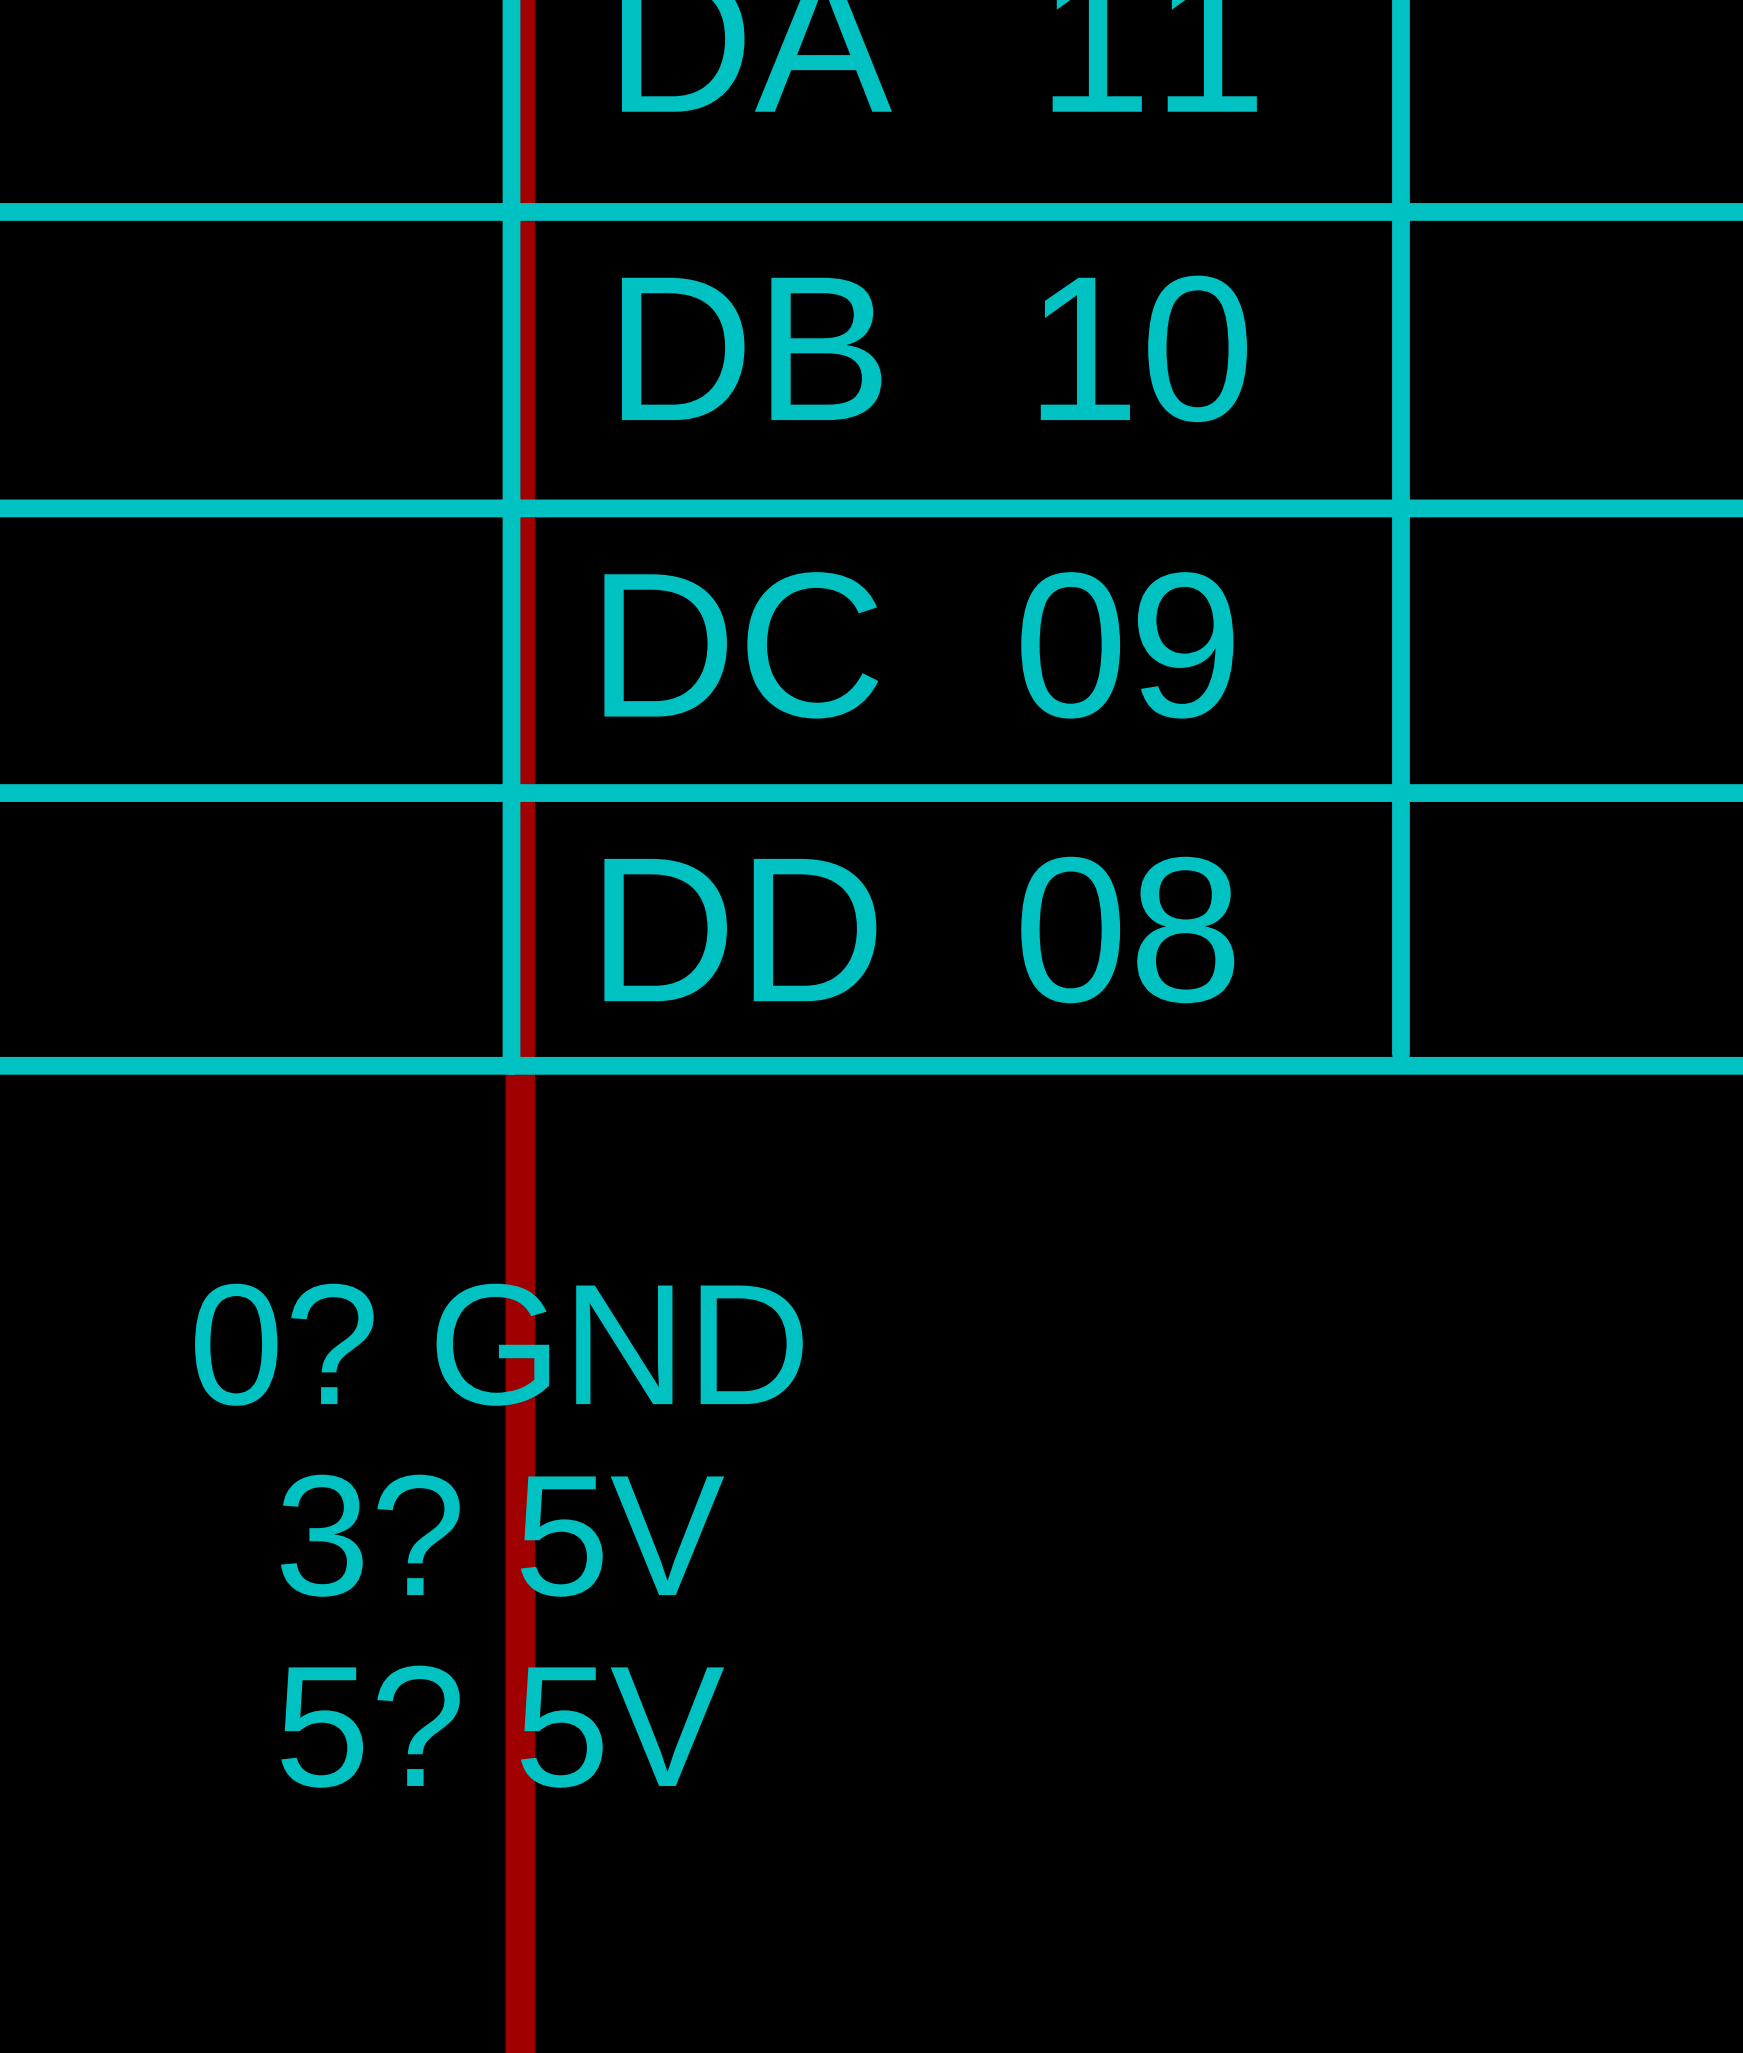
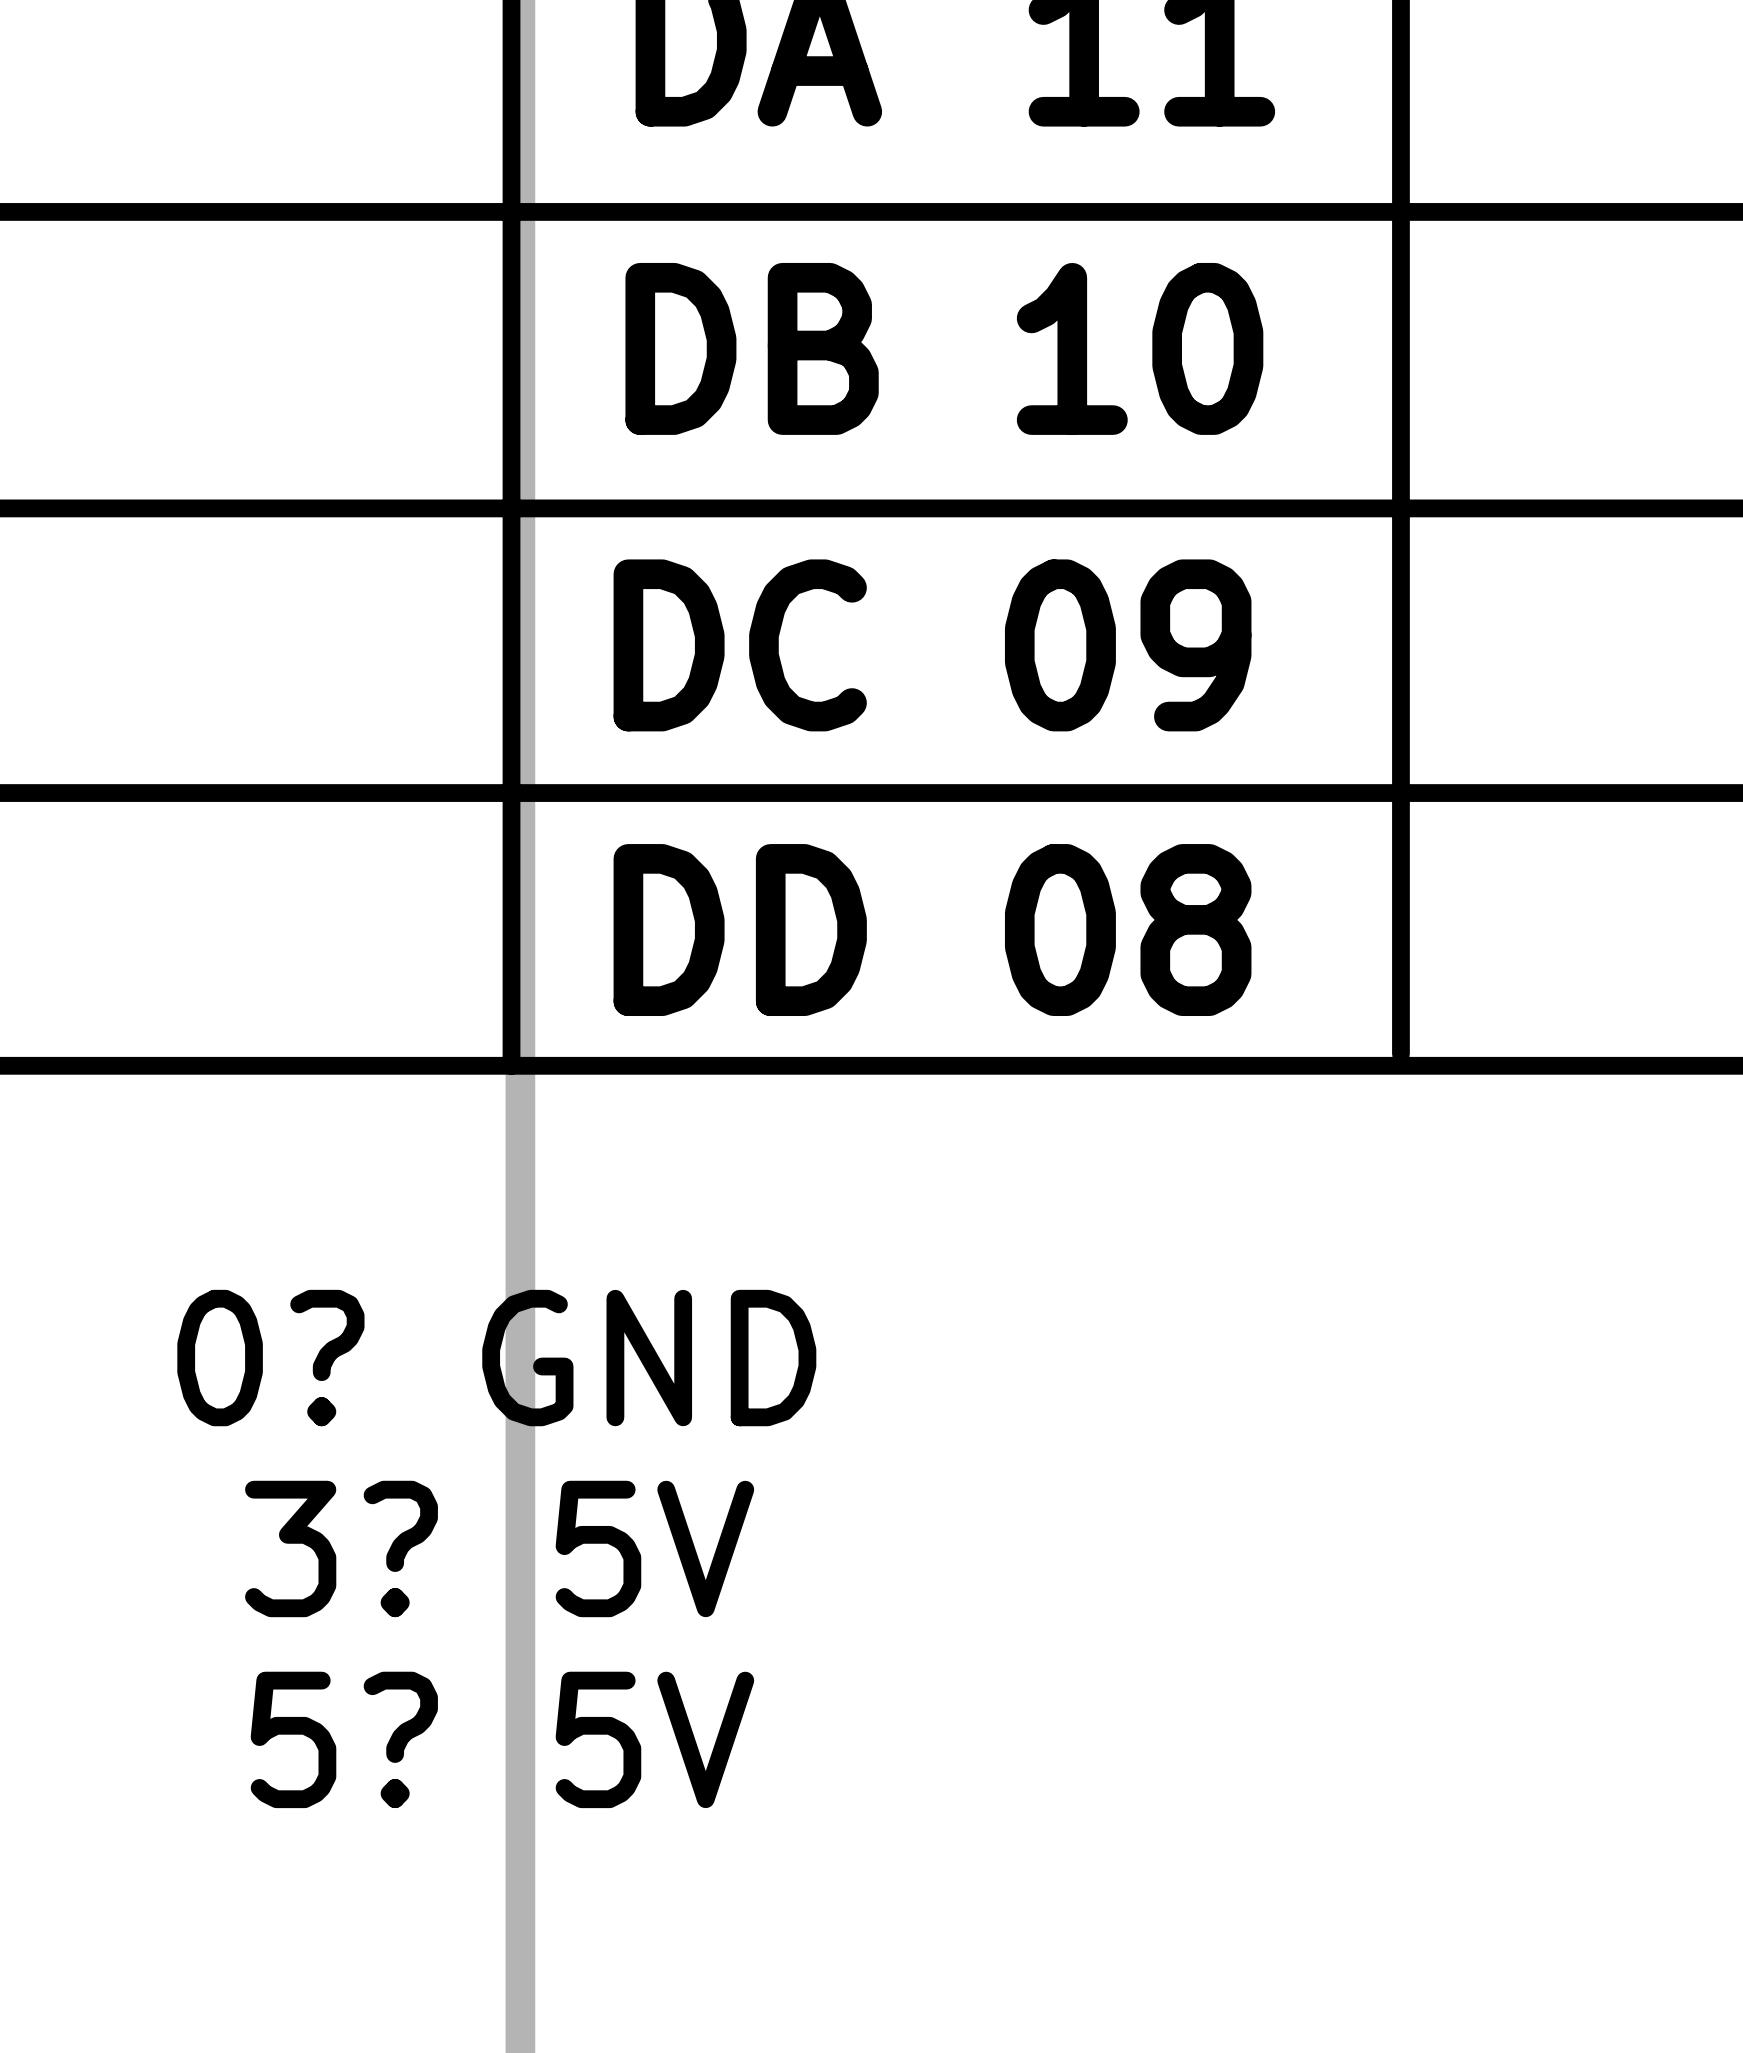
text position: 0? GND (498, 1344) -> 0? GND (496, 1358)
text position: 3? 5V (502, 1535) -> 3? 5V (499, 1548)
text position: 5? 5V (502, 1726) -> 5? 5V (502, 1739)

